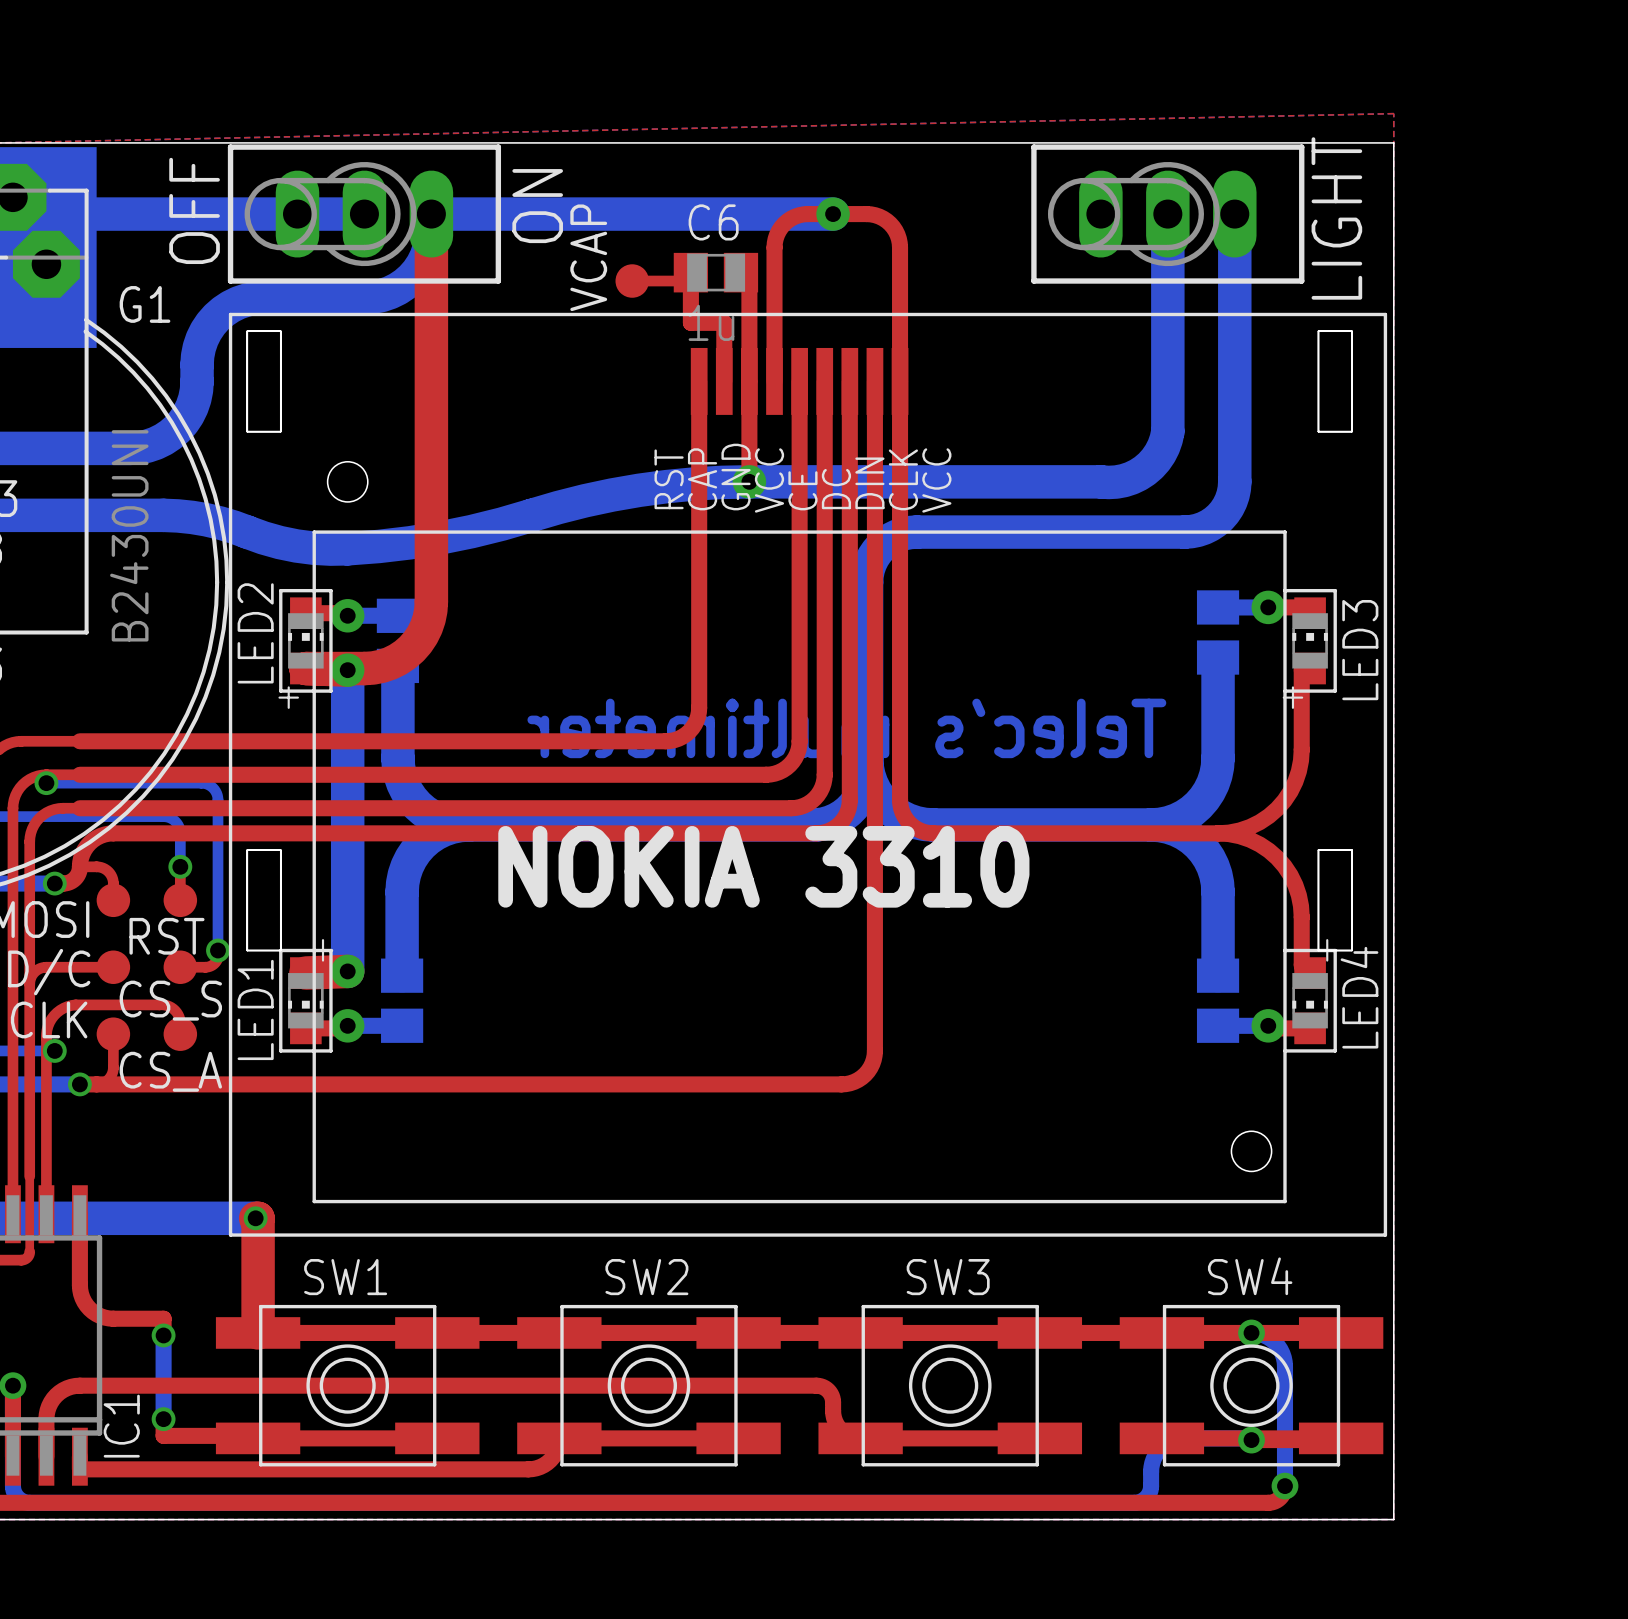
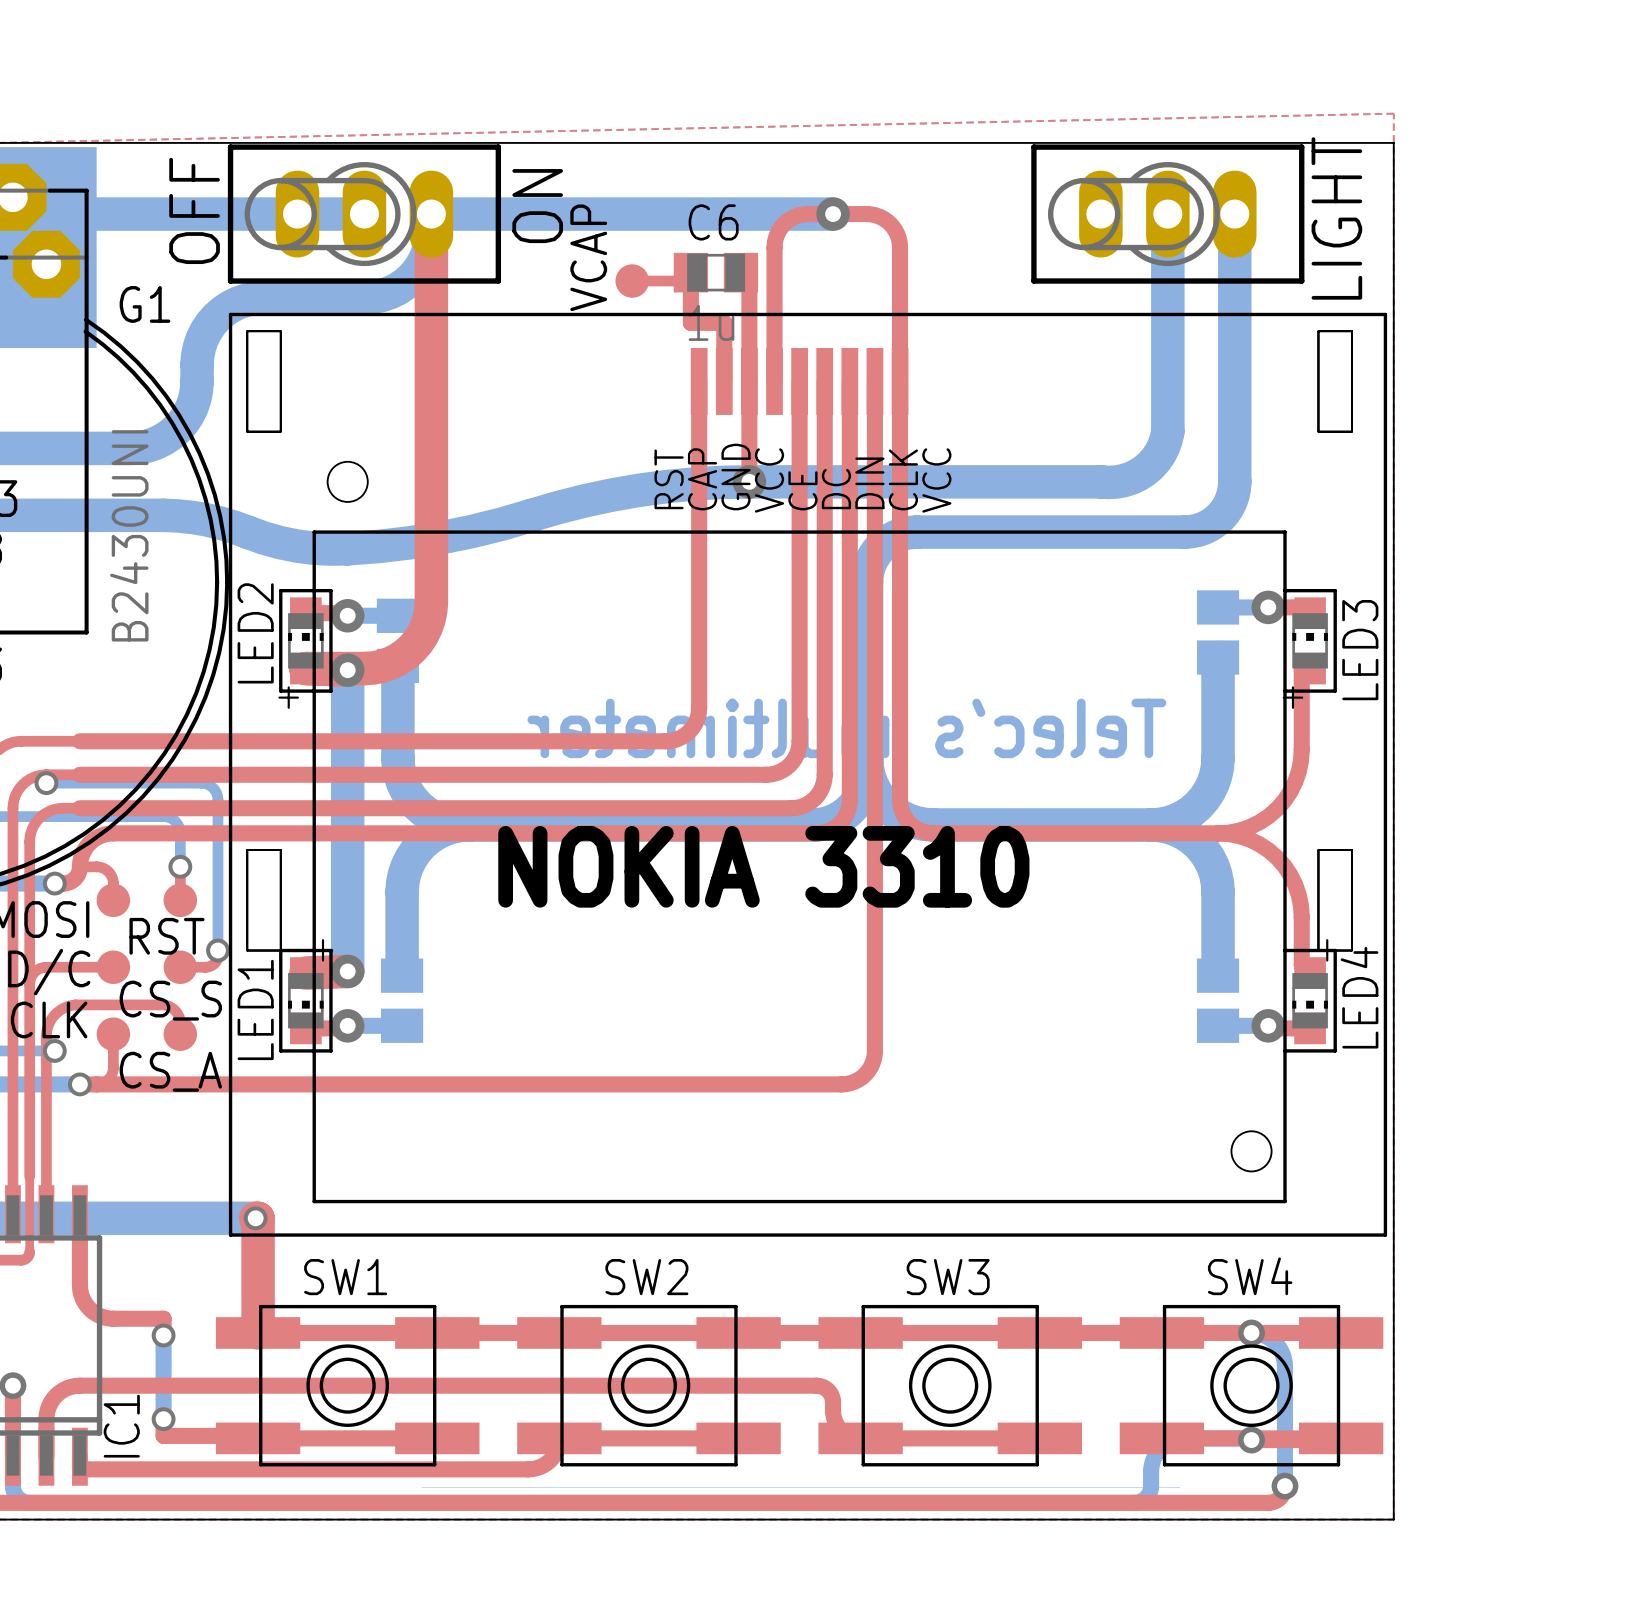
drawing: none -> [421, 1487, 1180, 1488]

